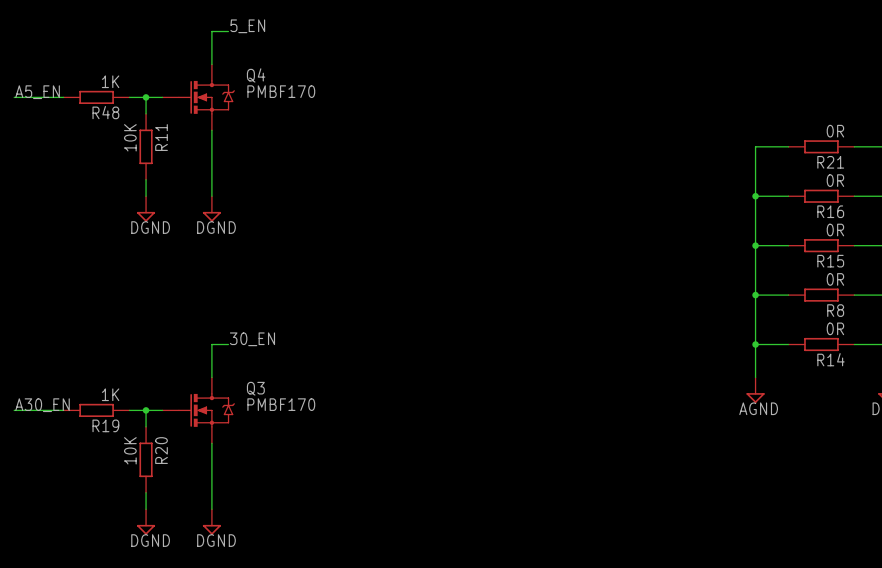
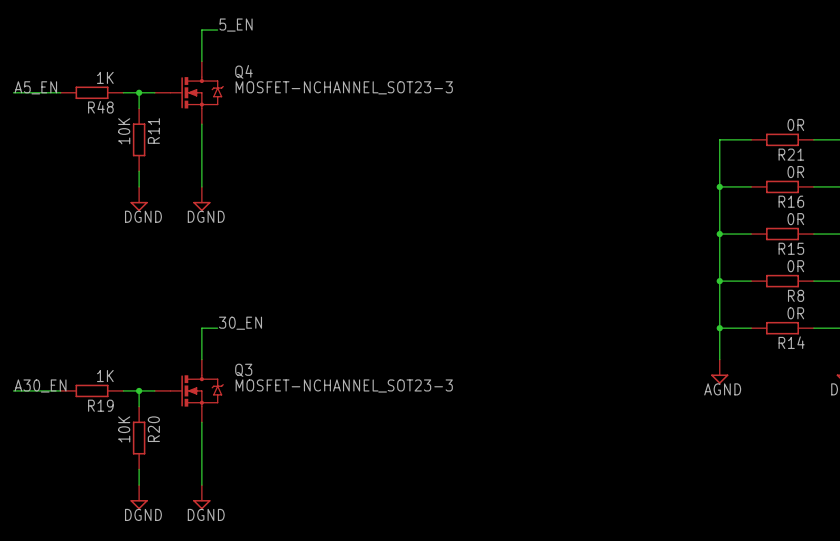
Q4 value: PMBF170 (281, 91) -> MOSFET-NCHANNEL_SOT23-3 (344, 87)
Q3 value: PMBF170 (281, 404) -> MOSFET-NCHANNEL_SOT23-3 (344, 385)

